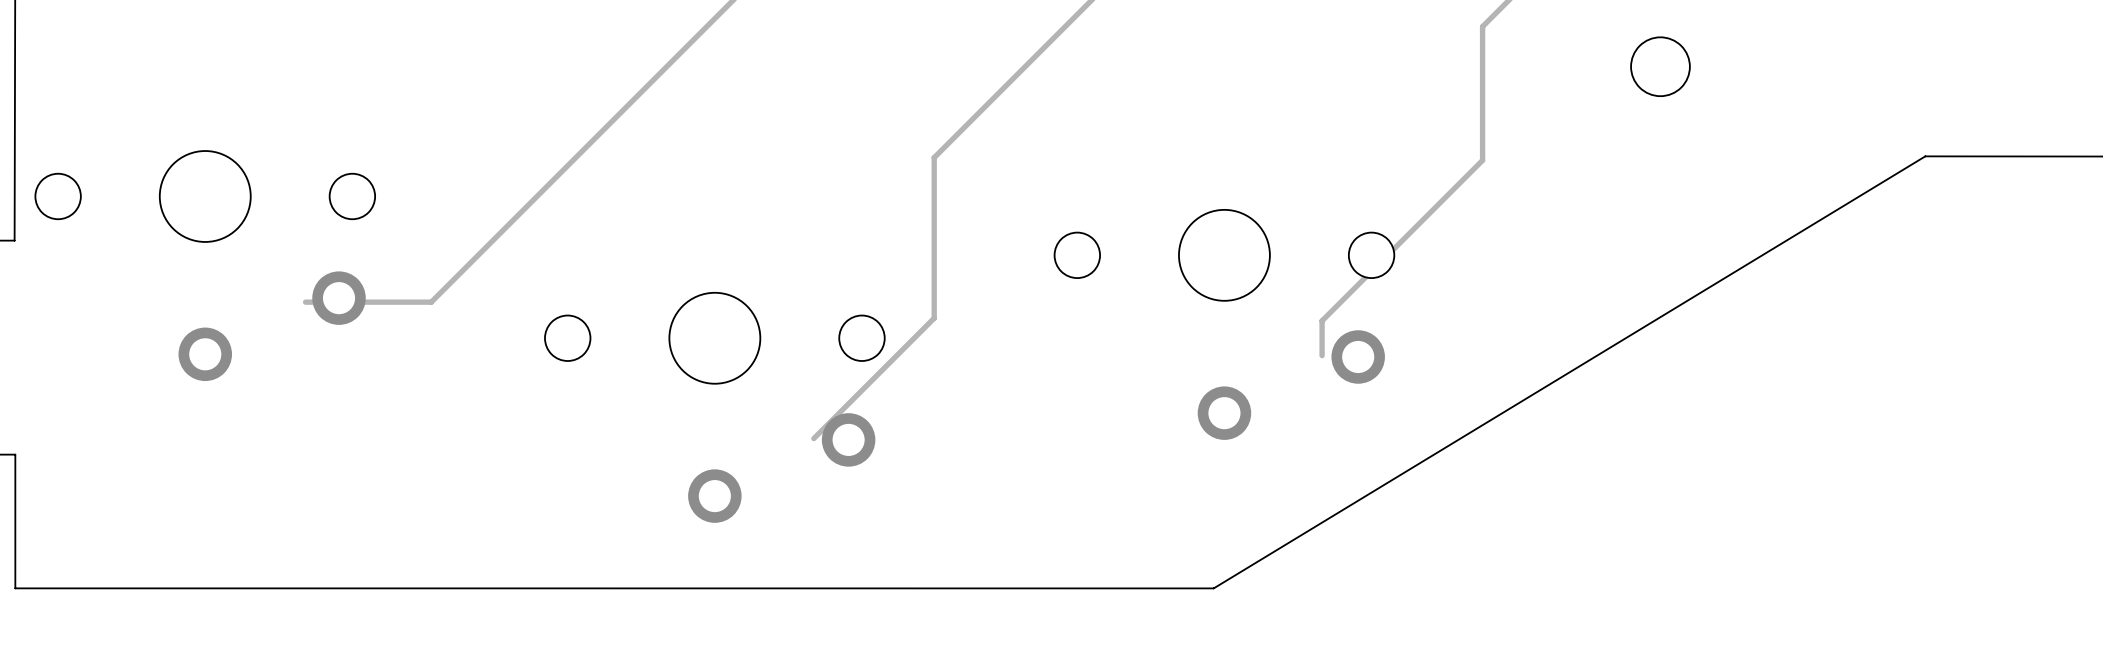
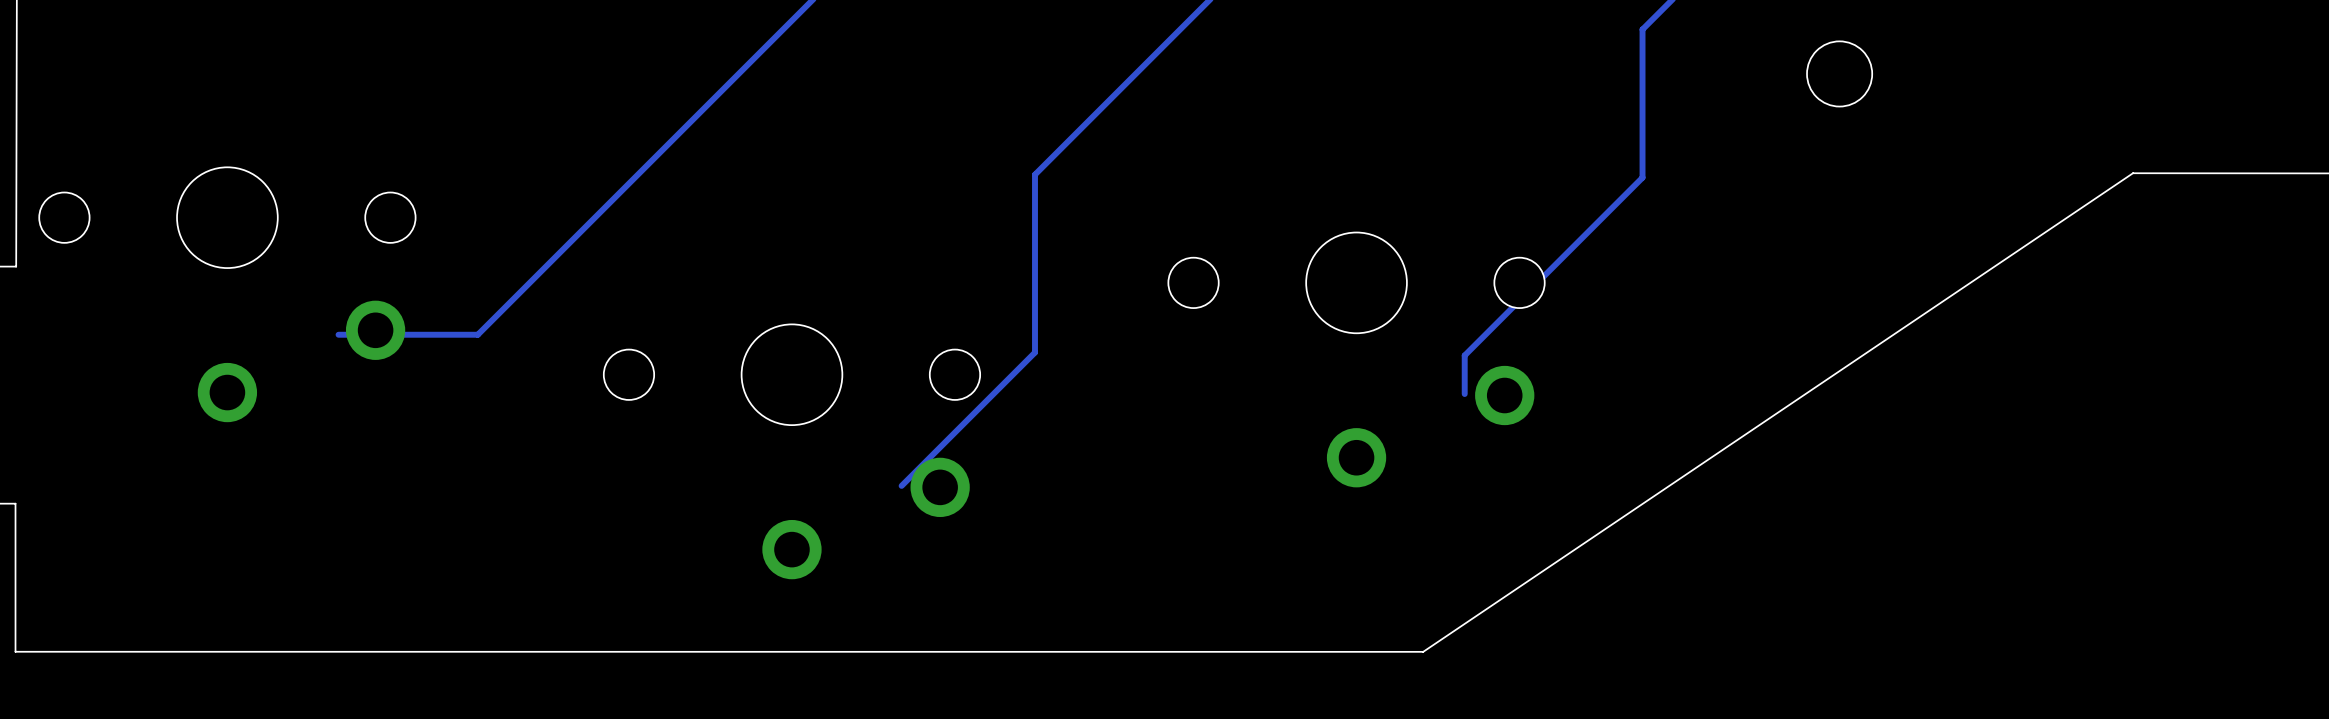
board edge: (1925, 156) (1213, 588) (15, 588) (14, 454) -> (2133, 173) (1423, 651) (15, 651) (15, 503)

